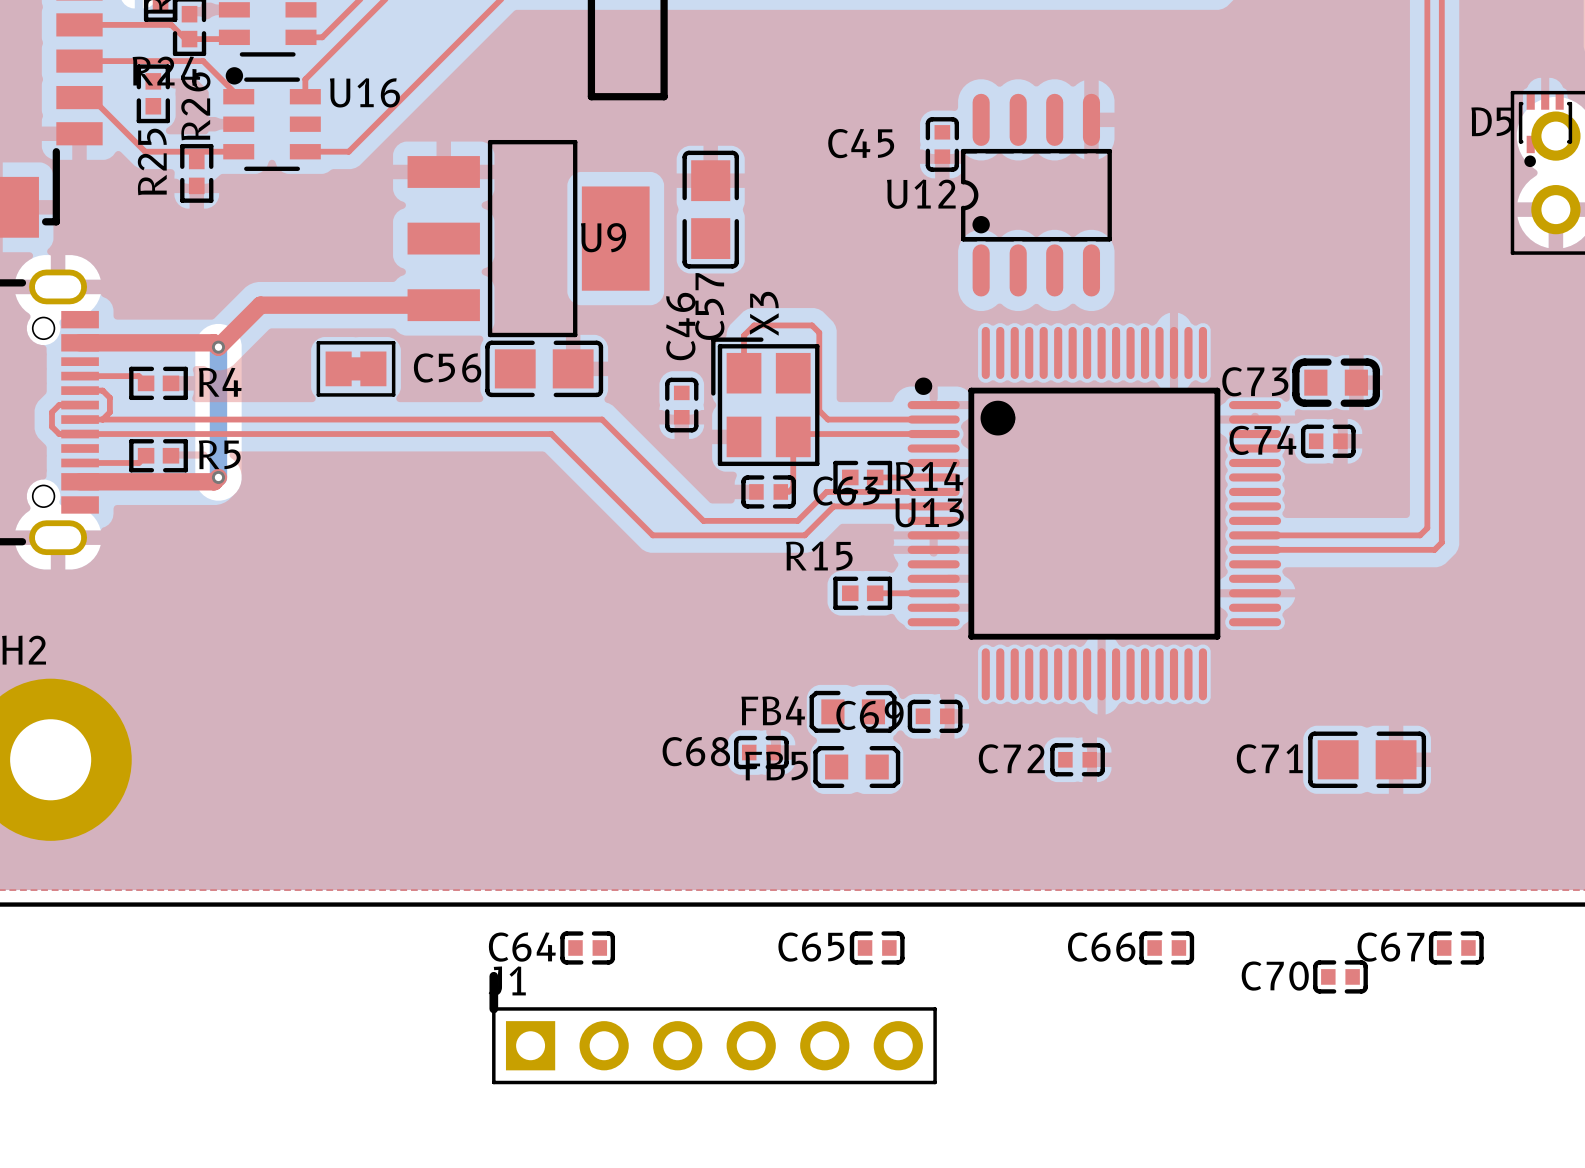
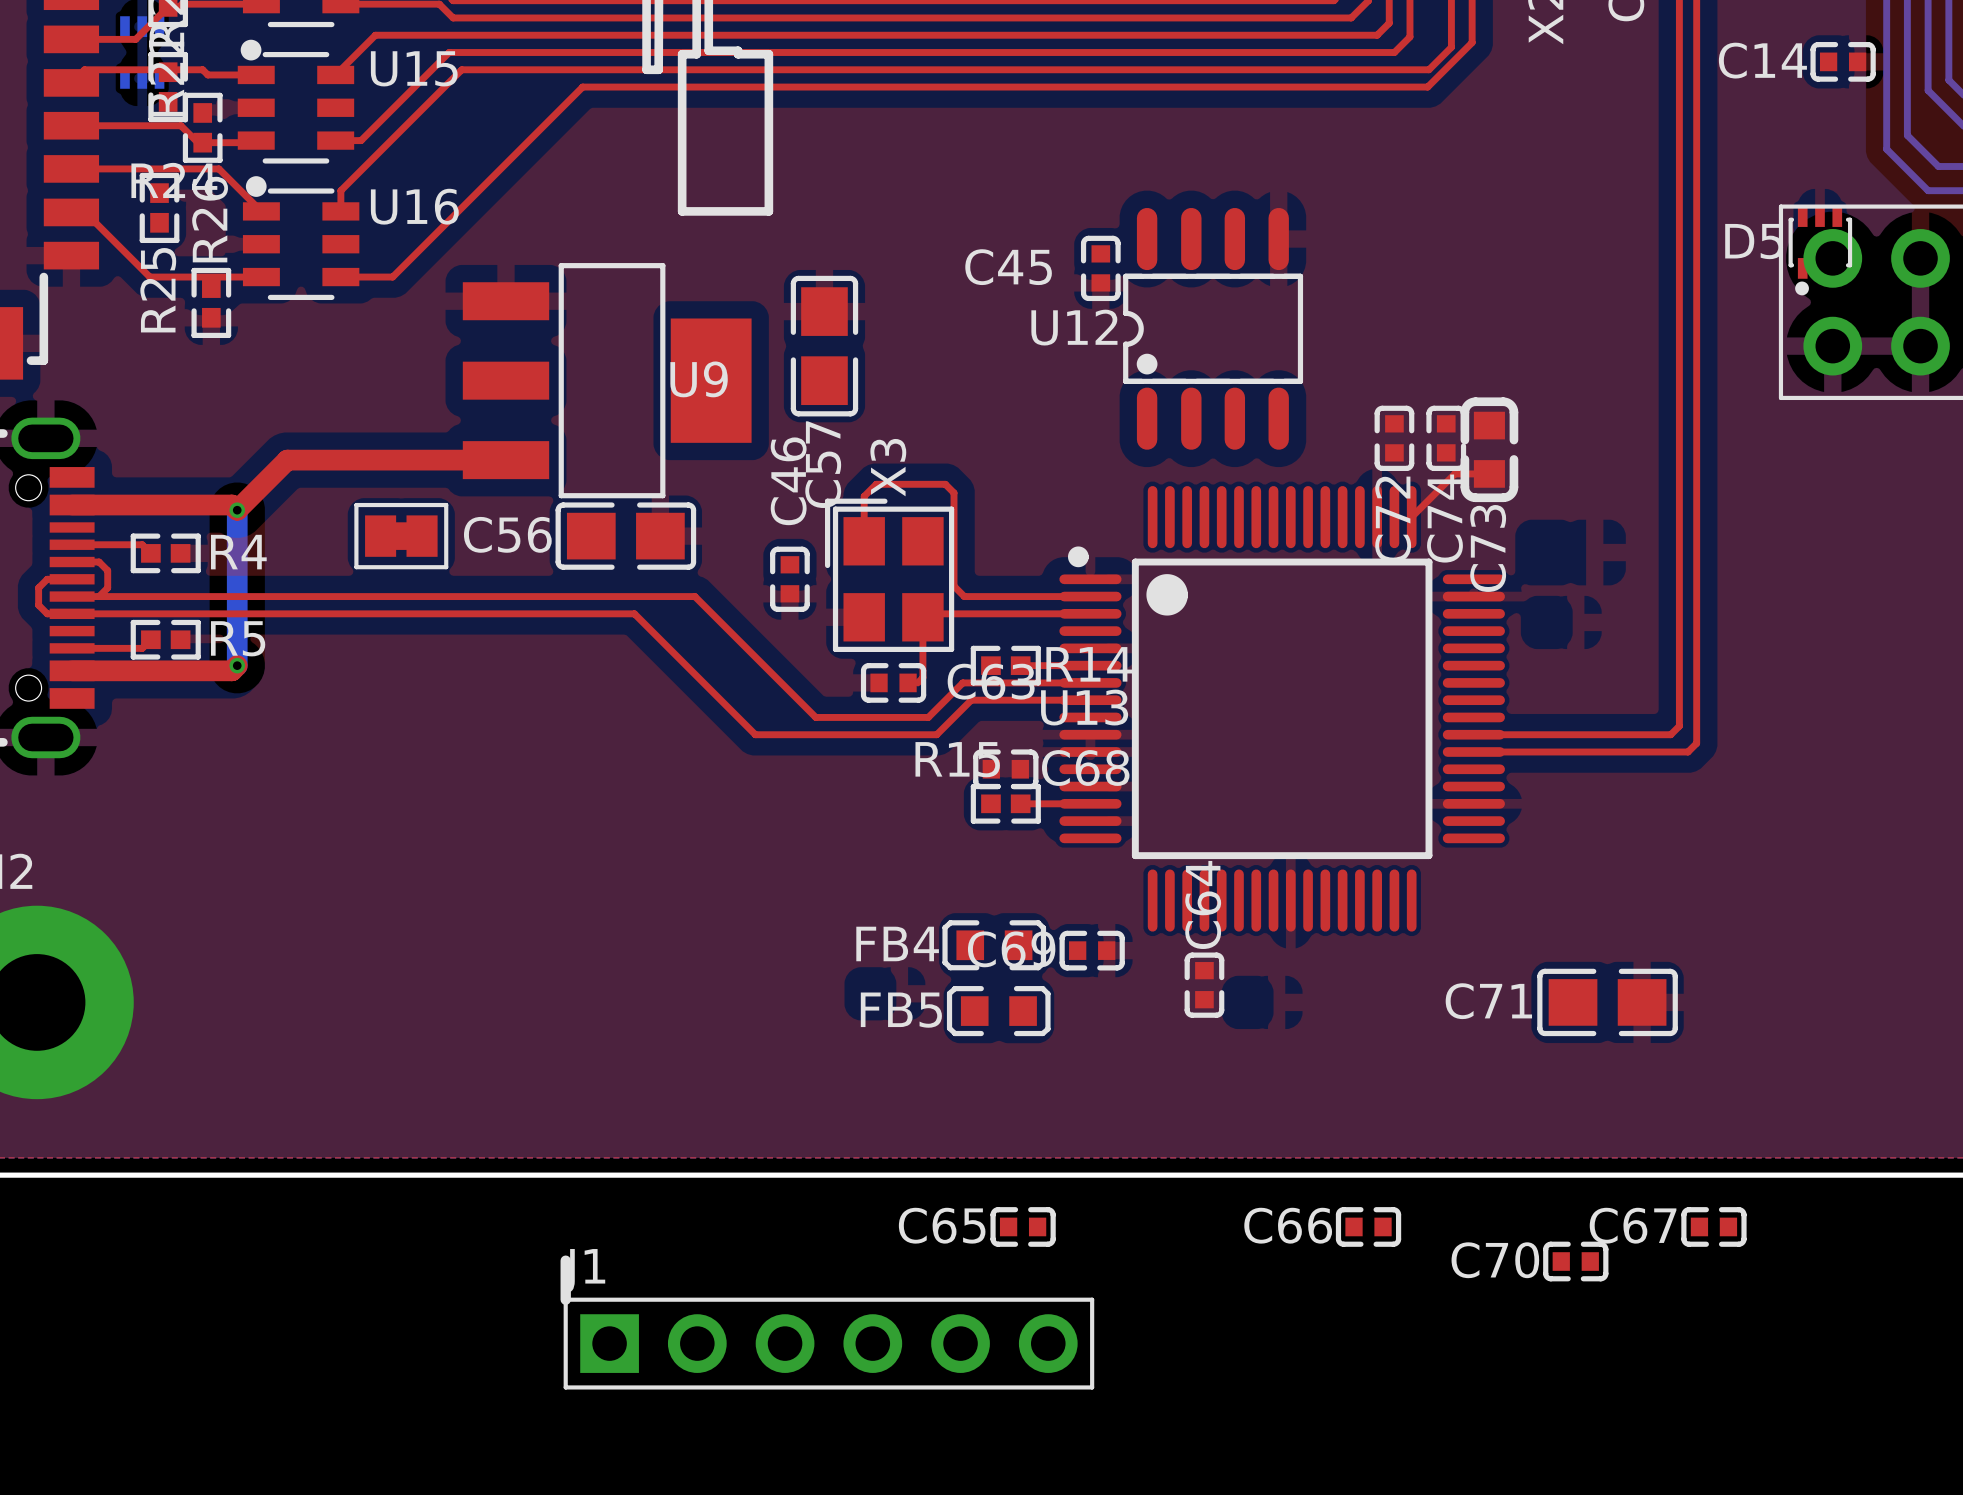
top track: none -> (1489, 473) (1454, 473) (1411, 517)
C73 name position: C73 (1255, 381) -> C73 (1488, 548)
C73 rotation: 0° (1336, 382) -> 90° clockwise (1489, 449)
C73 position: (1336, 382) -> (1489, 449)
C74 name position: C74 (1262, 440) -> C74 (1444, 518)
C74 rotation: 0° (1328, 441) -> 90° clockwise (1446, 438)
C74 position: (1328, 441) -> (1446, 438)
C68 name position: C68 (696, 751) -> C68 (1085, 768)
C68 position: (761, 752) -> (1005, 769)
C72 name position: C72 (1011, 758) -> C72 (1393, 519)
C72 rotation: 0° (1077, 759) -> 90° clockwise (1394, 438)
C72 position: (1077, 759) -> (1394, 438)
C64 rotation: 0° (587, 947) -> 90° clockwise (1204, 985)
C64 position: (587, 947) -> (1204, 985)

